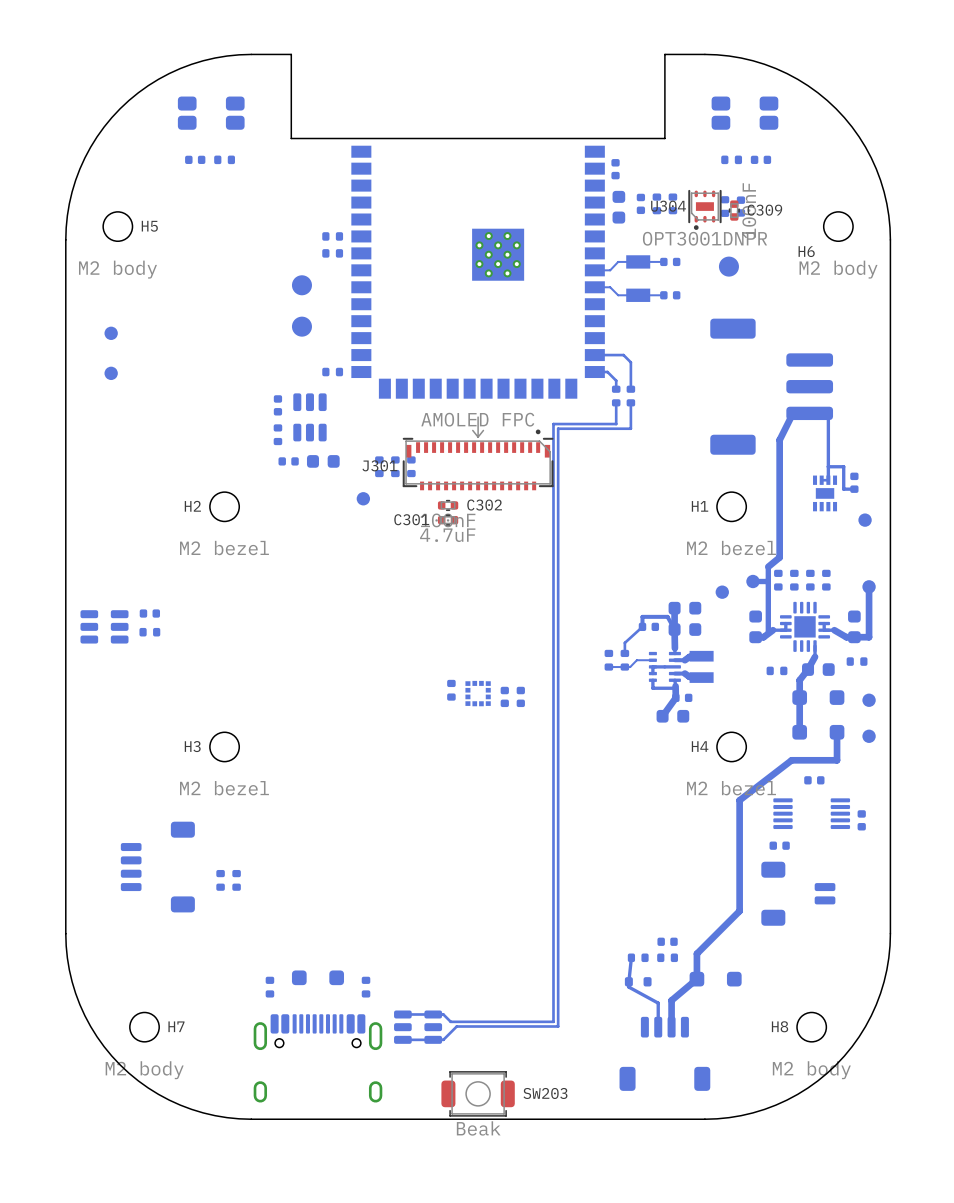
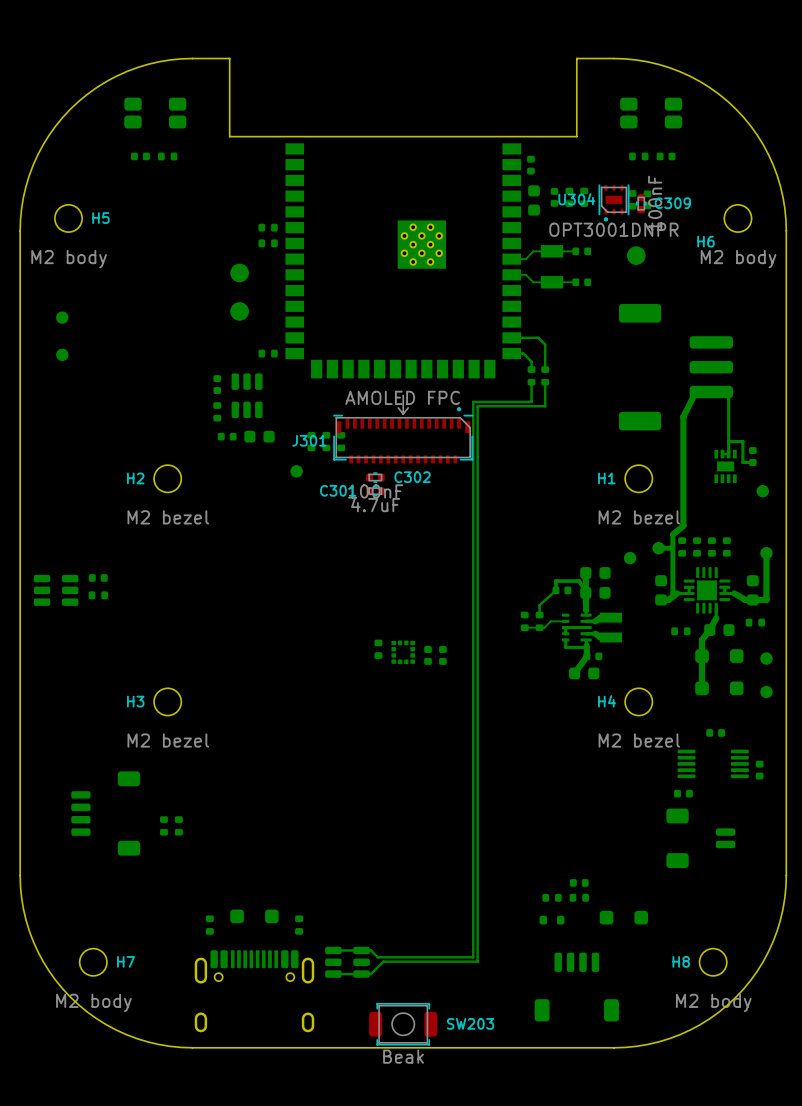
bottom track: (837, 732) (837, 760) (791, 760) (739, 800) (739, 911) (696, 953) (696, 979) (671, 1000) (671, 1027) -> none
bottom track: (631, 957) (628, 987) (658, 1003) (658, 1027) -> none

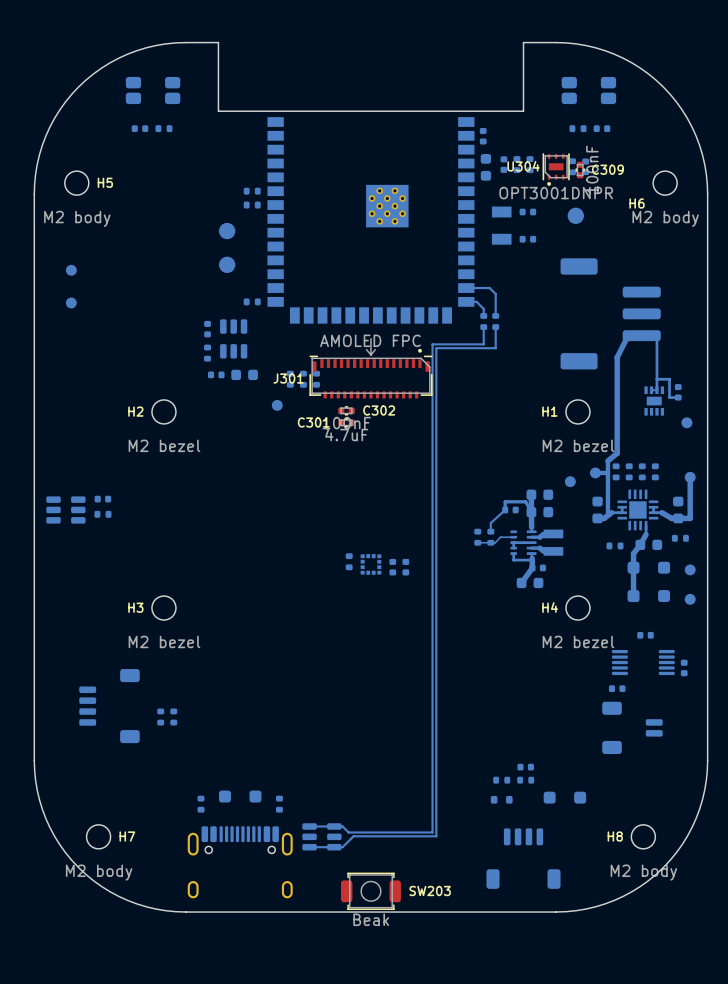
bottom track: (575, 251) (533, 251) (525, 259) (511, 259) -> none
bottom track: (511, 274) (525, 274) (533, 282) (575, 282) -> none

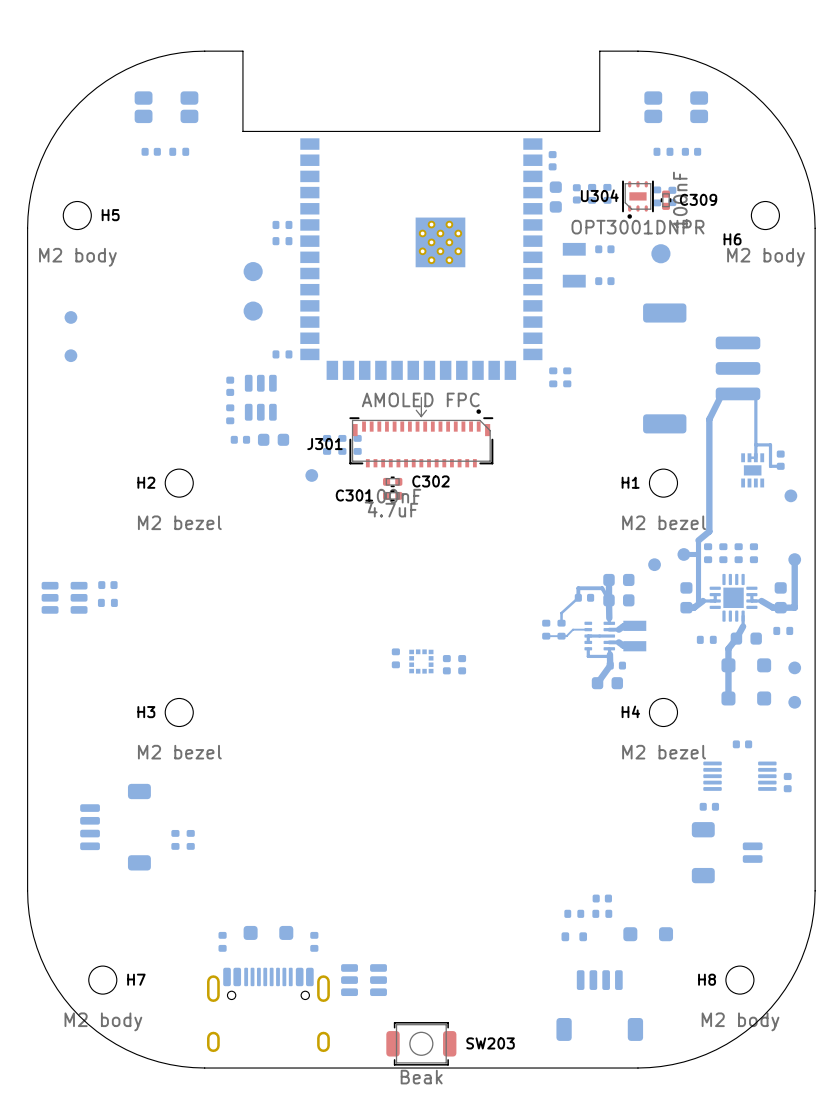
bottom track: (466, 288) (489, 288) (495, 294) (495, 315) -> none
bottom track: (466, 301) (476, 301) (483, 308) (483, 315) -> none
bottom track: (483, 327) (483, 344) (432, 344) (432, 832) (348, 832) (342, 826) (309, 826) -> none
bottom track: (495, 327) (495, 348) (436, 348) (436, 836) (353, 836) (342, 847) (309, 847) -> none

